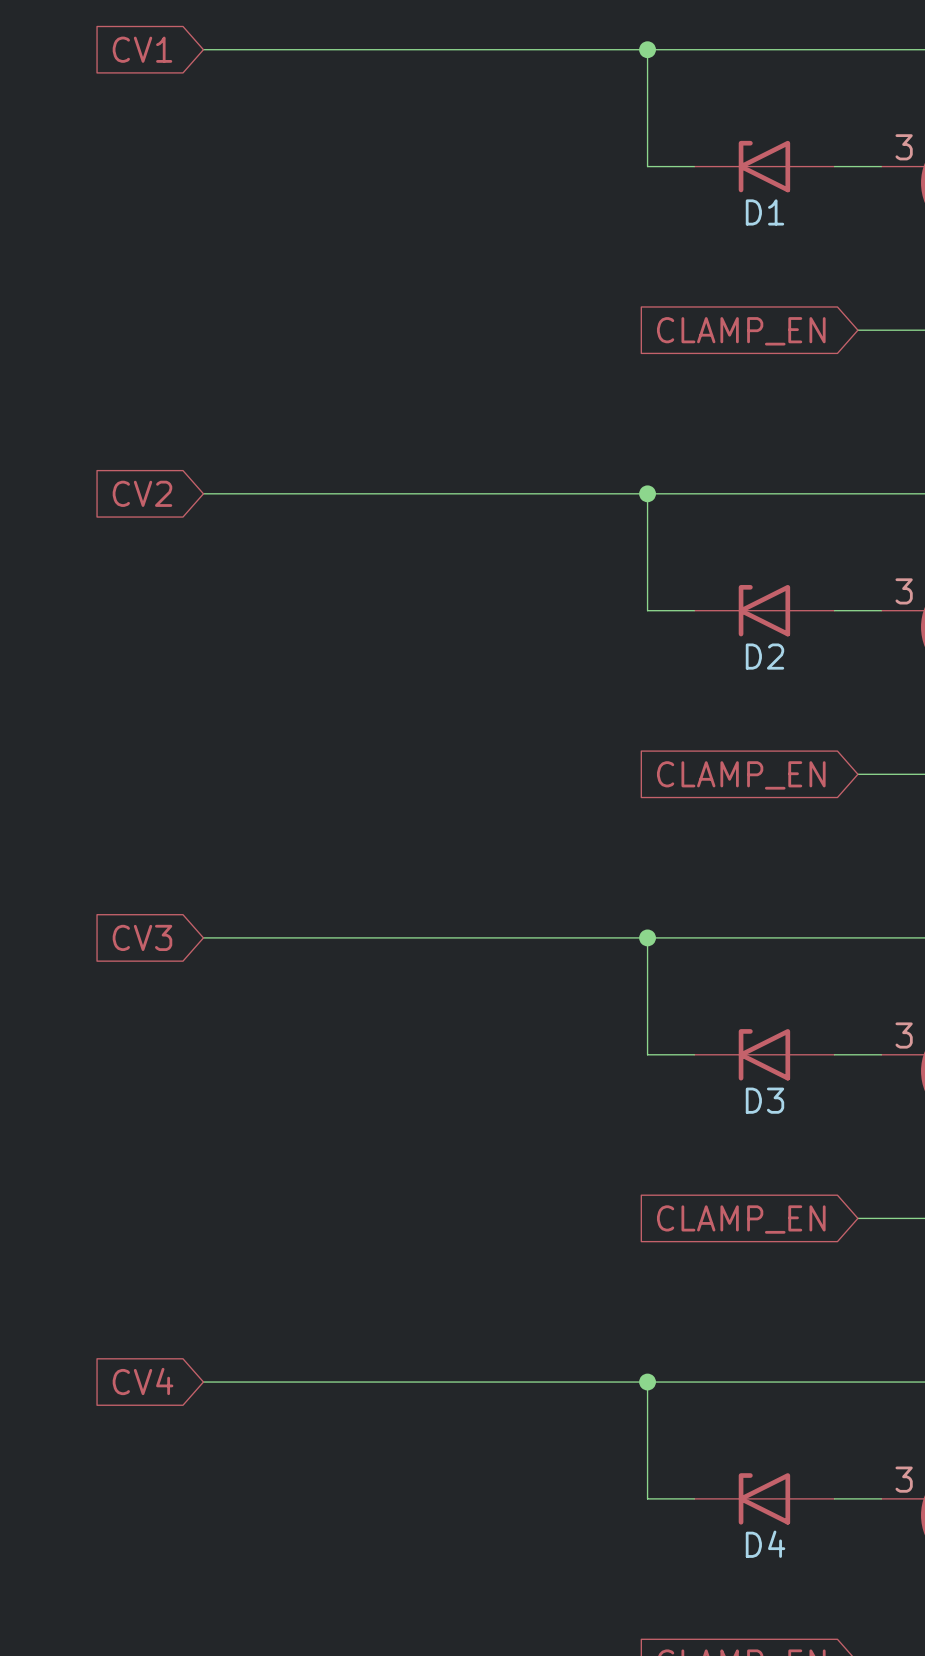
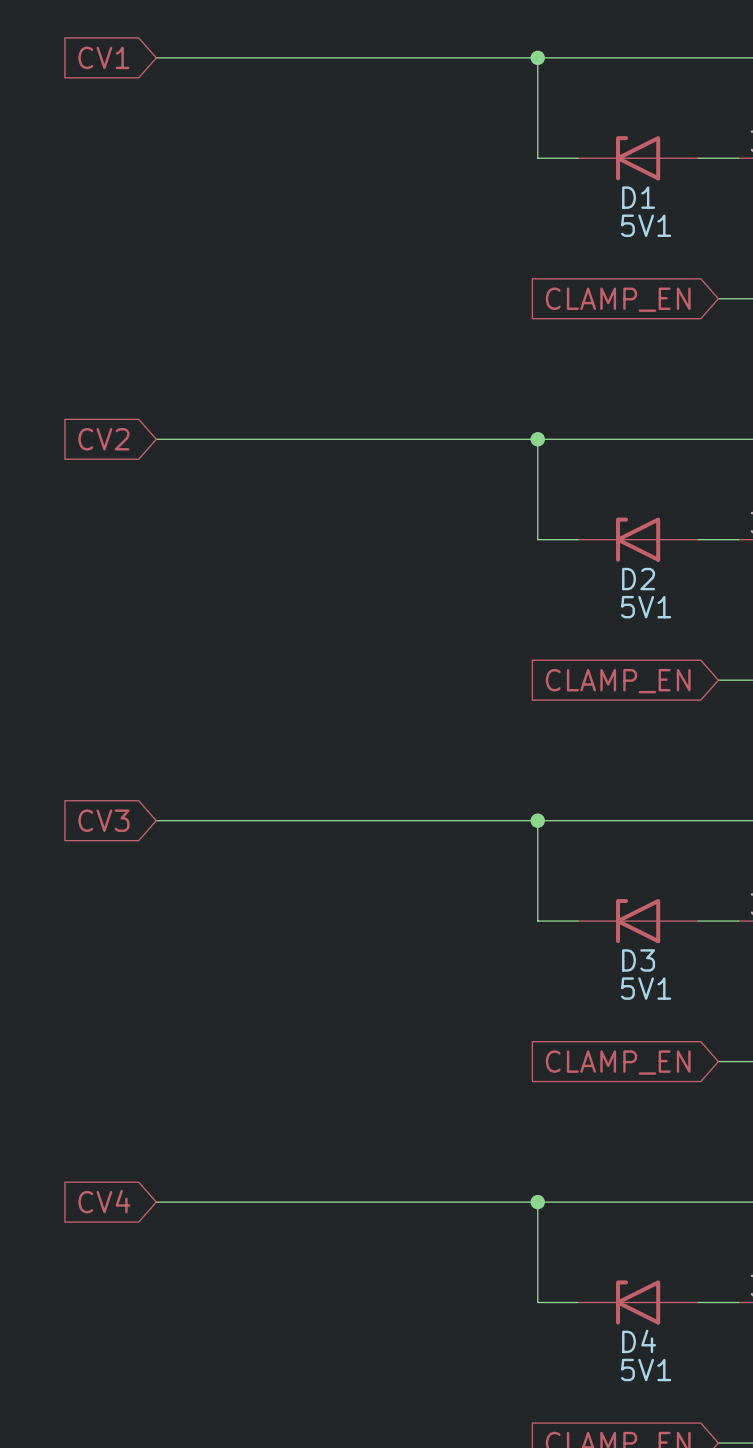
D1 value: none -> 5V1 (646, 225)
D2 value: none -> 5V1 (646, 607)
D3 value: none -> 5V1 (646, 988)
D4 value: none -> 5V1 (646, 1370)

